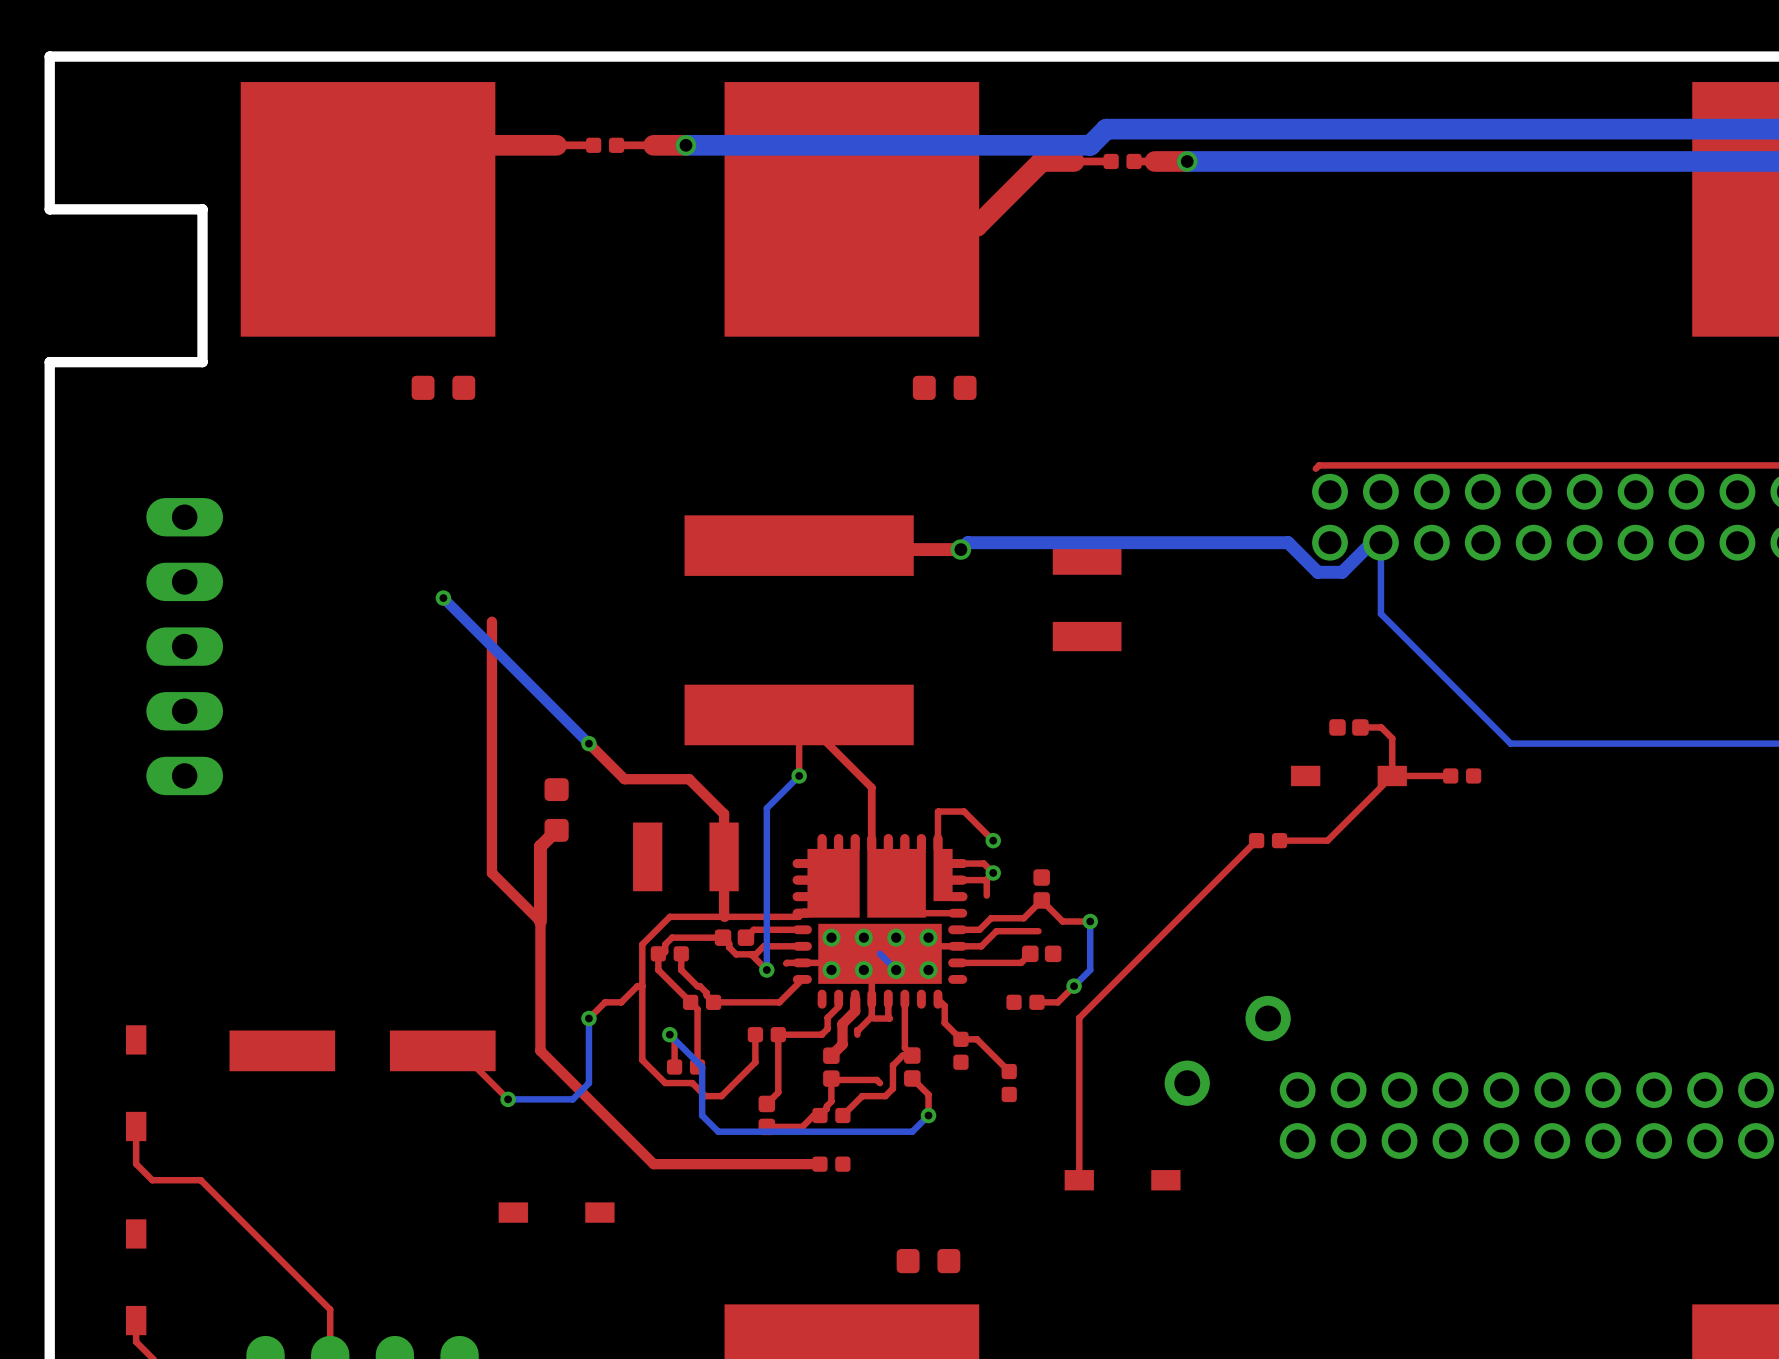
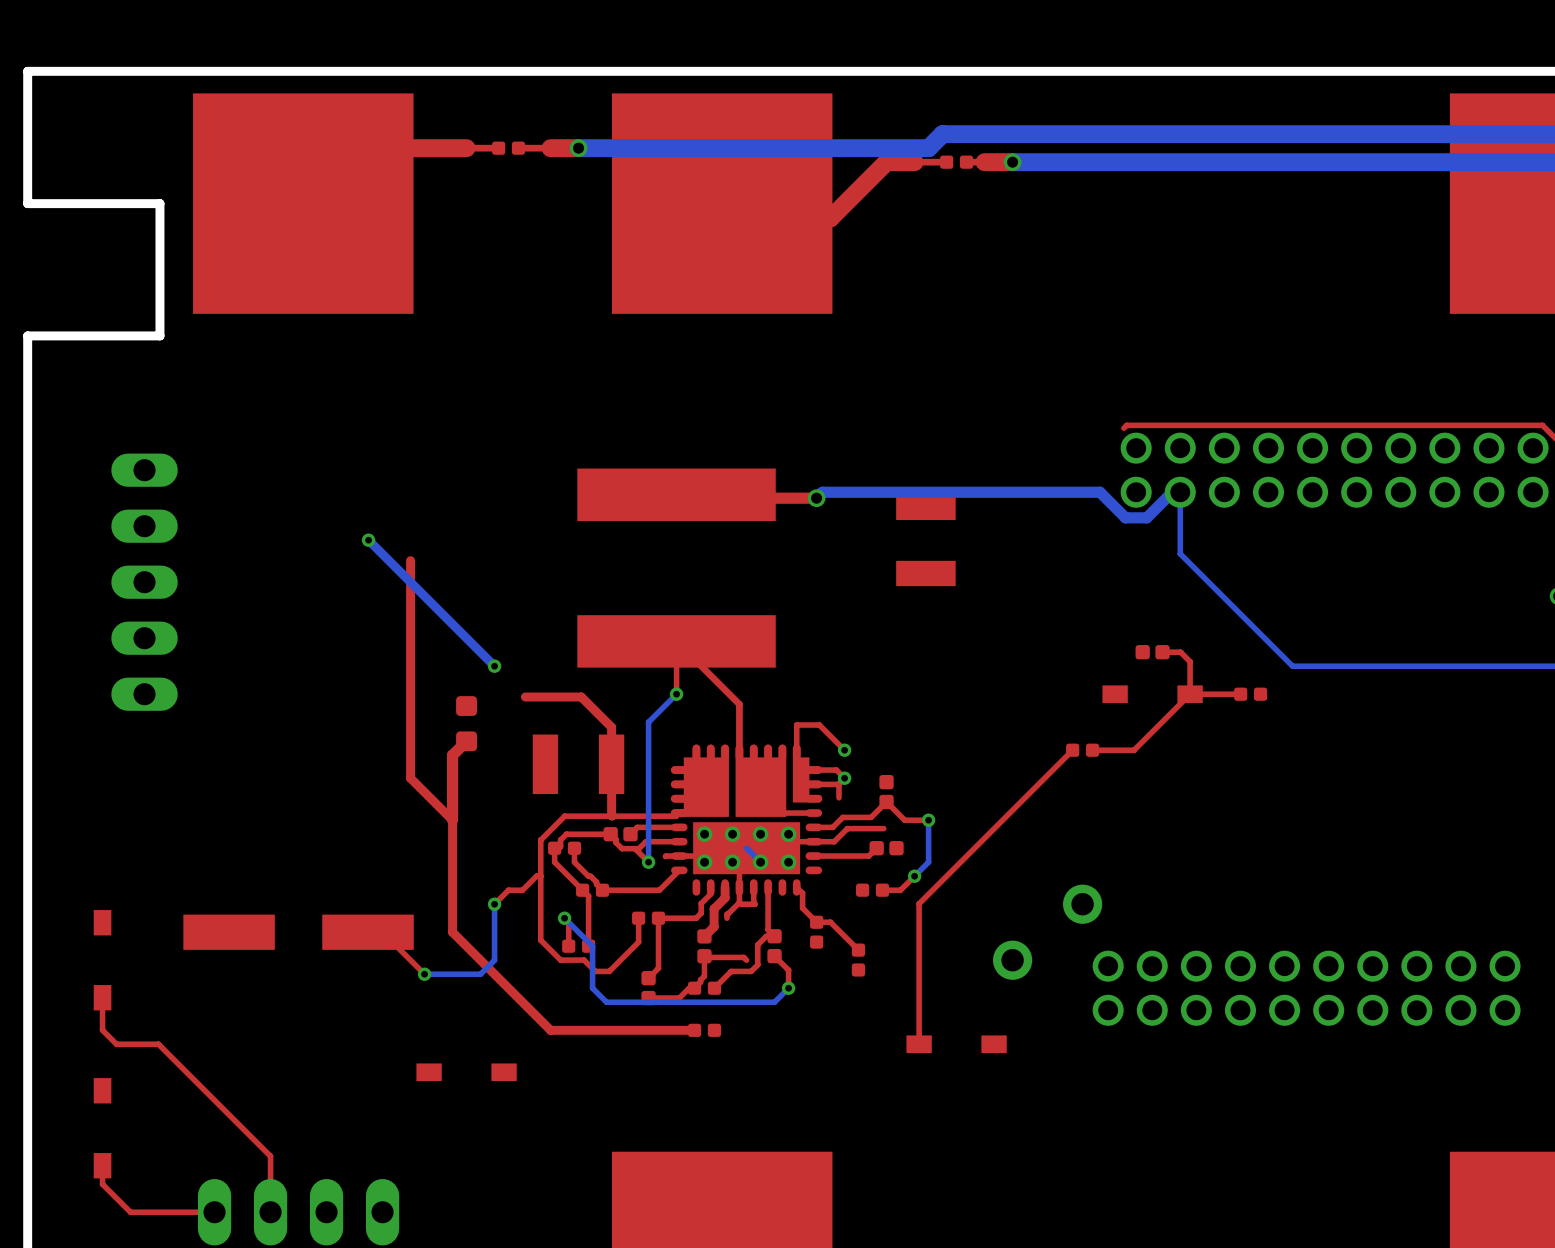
part: (443, 387) -> none
part: (944, 387) -> none
top track: (588, 743) (624, 779) -> none
part: (928, 1261) -> none

